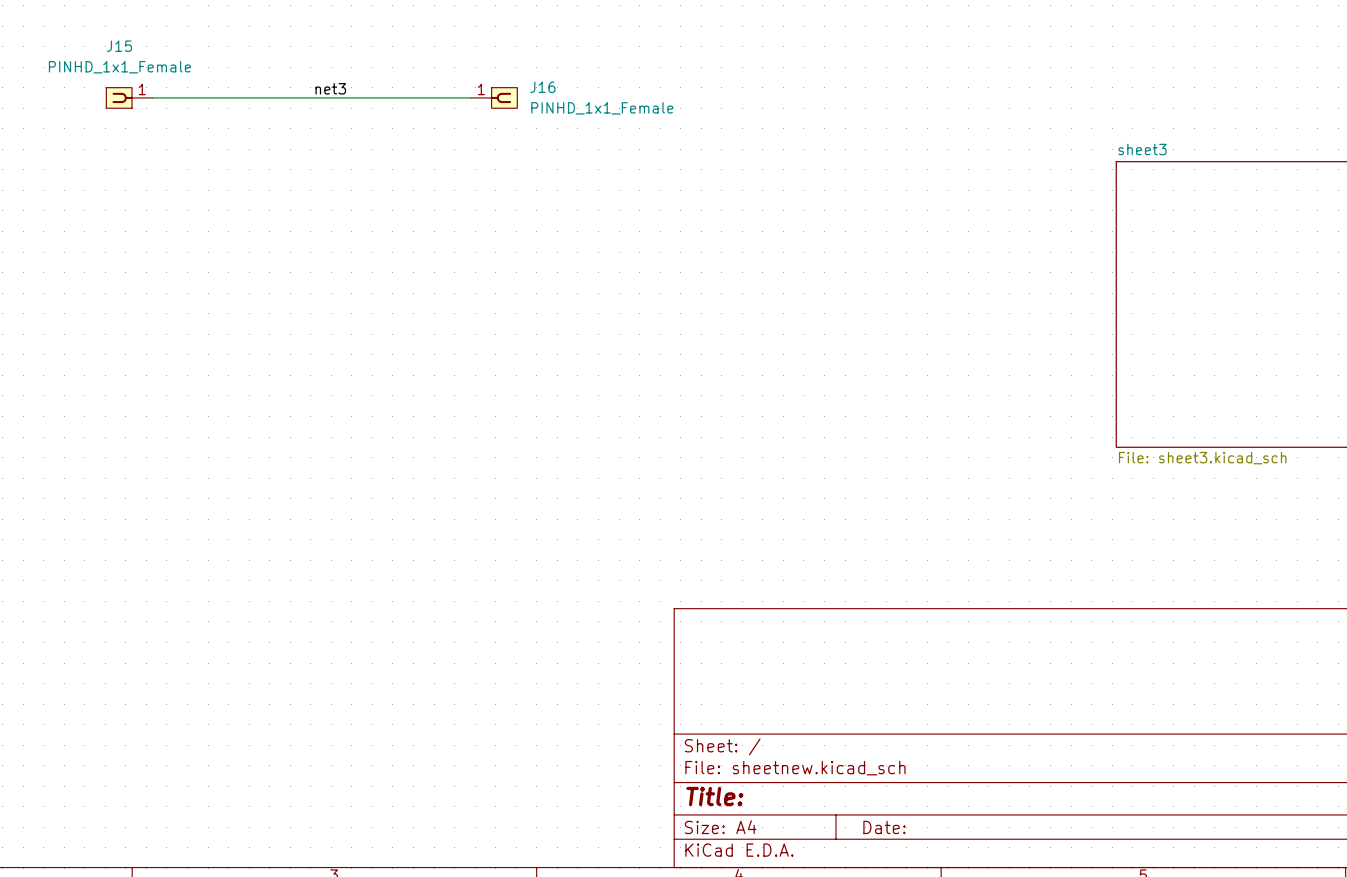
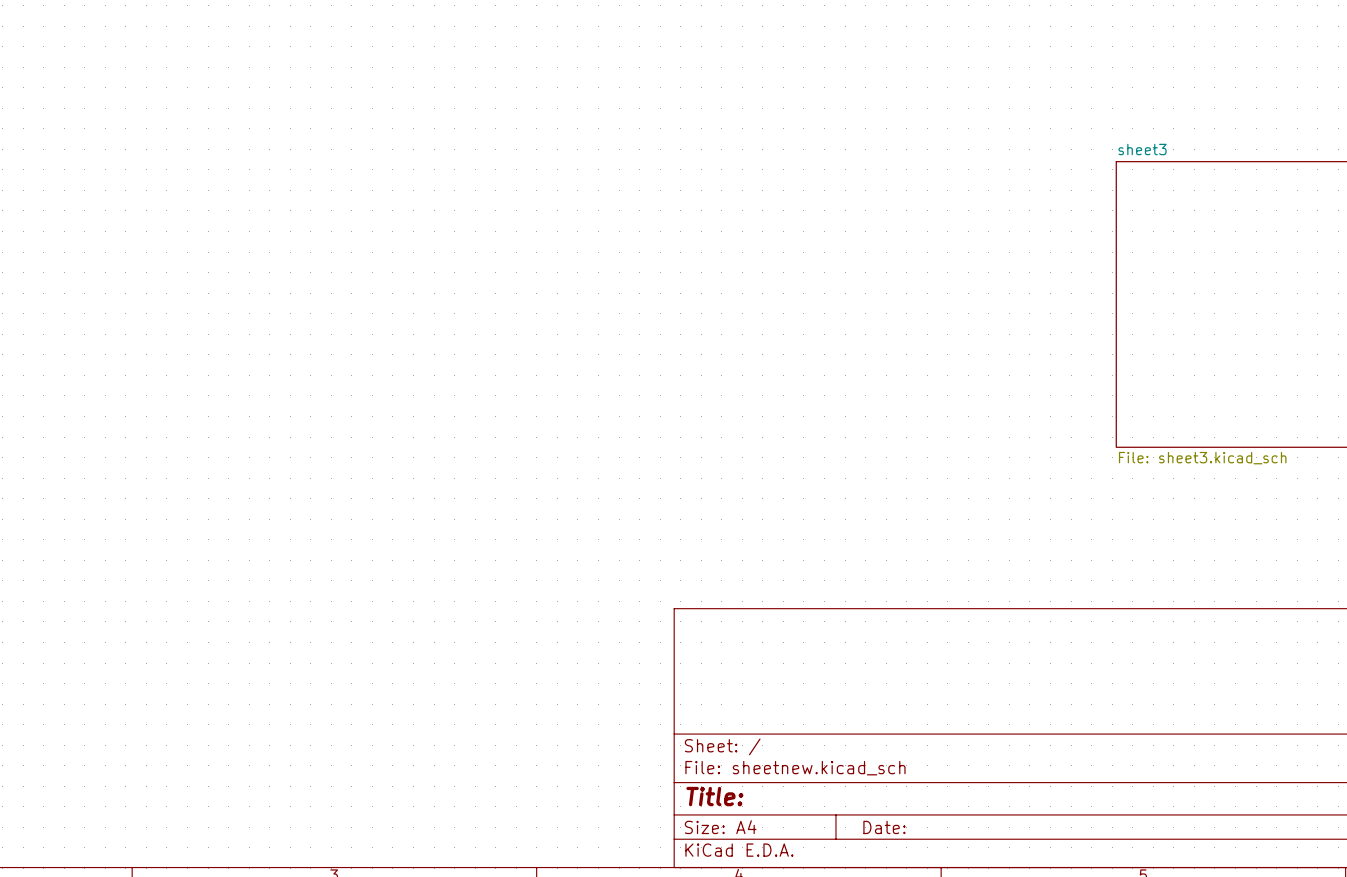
label: net3 (330, 88) -> none
J15: PINHD_1x1_Female (129, 97) -> none
wire: (152, 97) (471, 97) -> none
J16: PINHD_1x1_Female (494, 97) -> none

